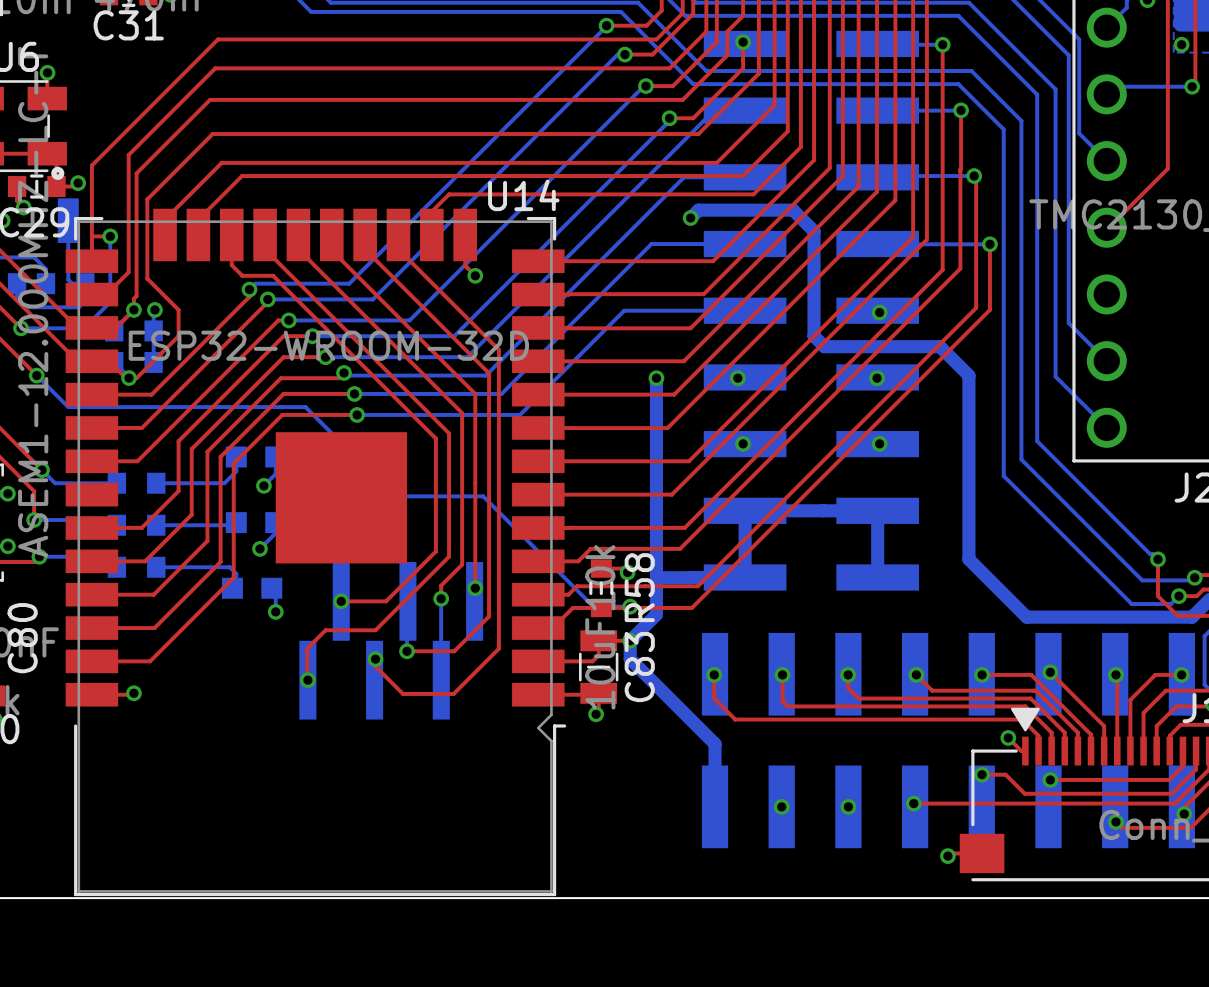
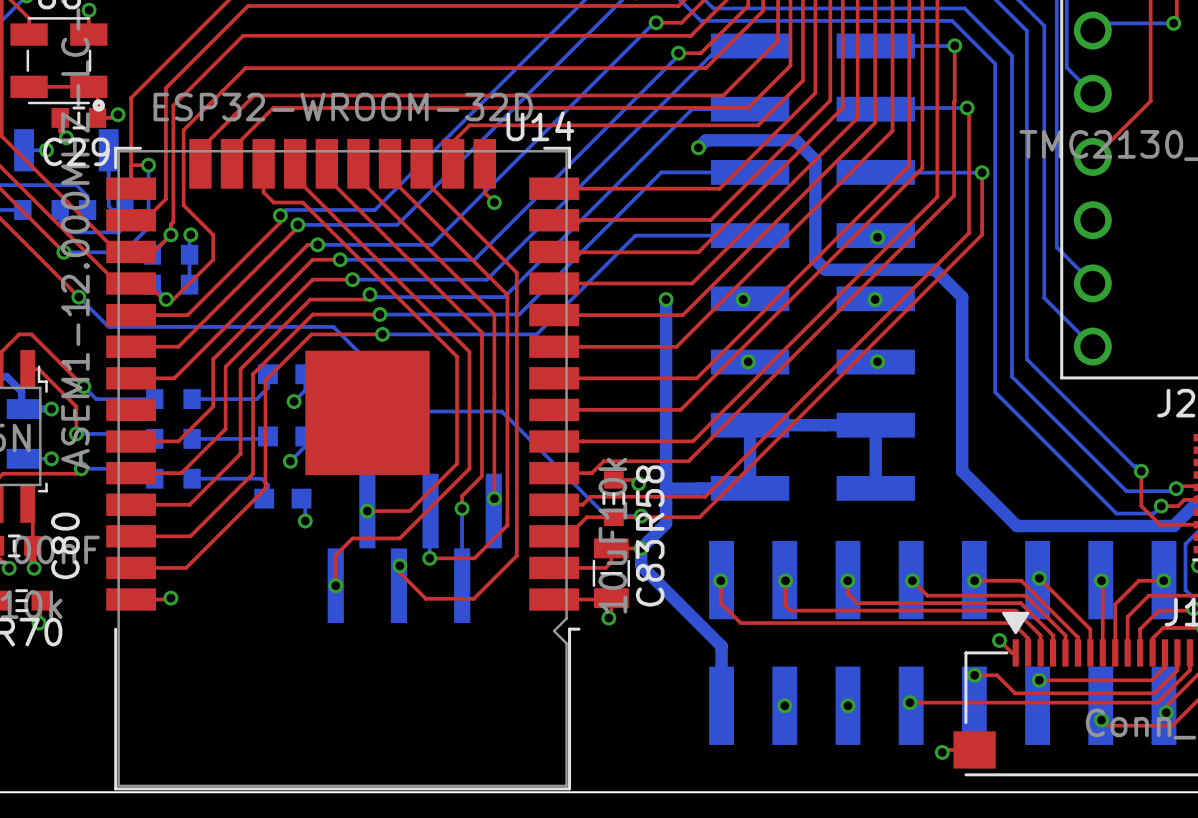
U14 value position: ESP32-WROOM-32D (328, 345) -> ESP32-WROOM-32D (343, 107)

